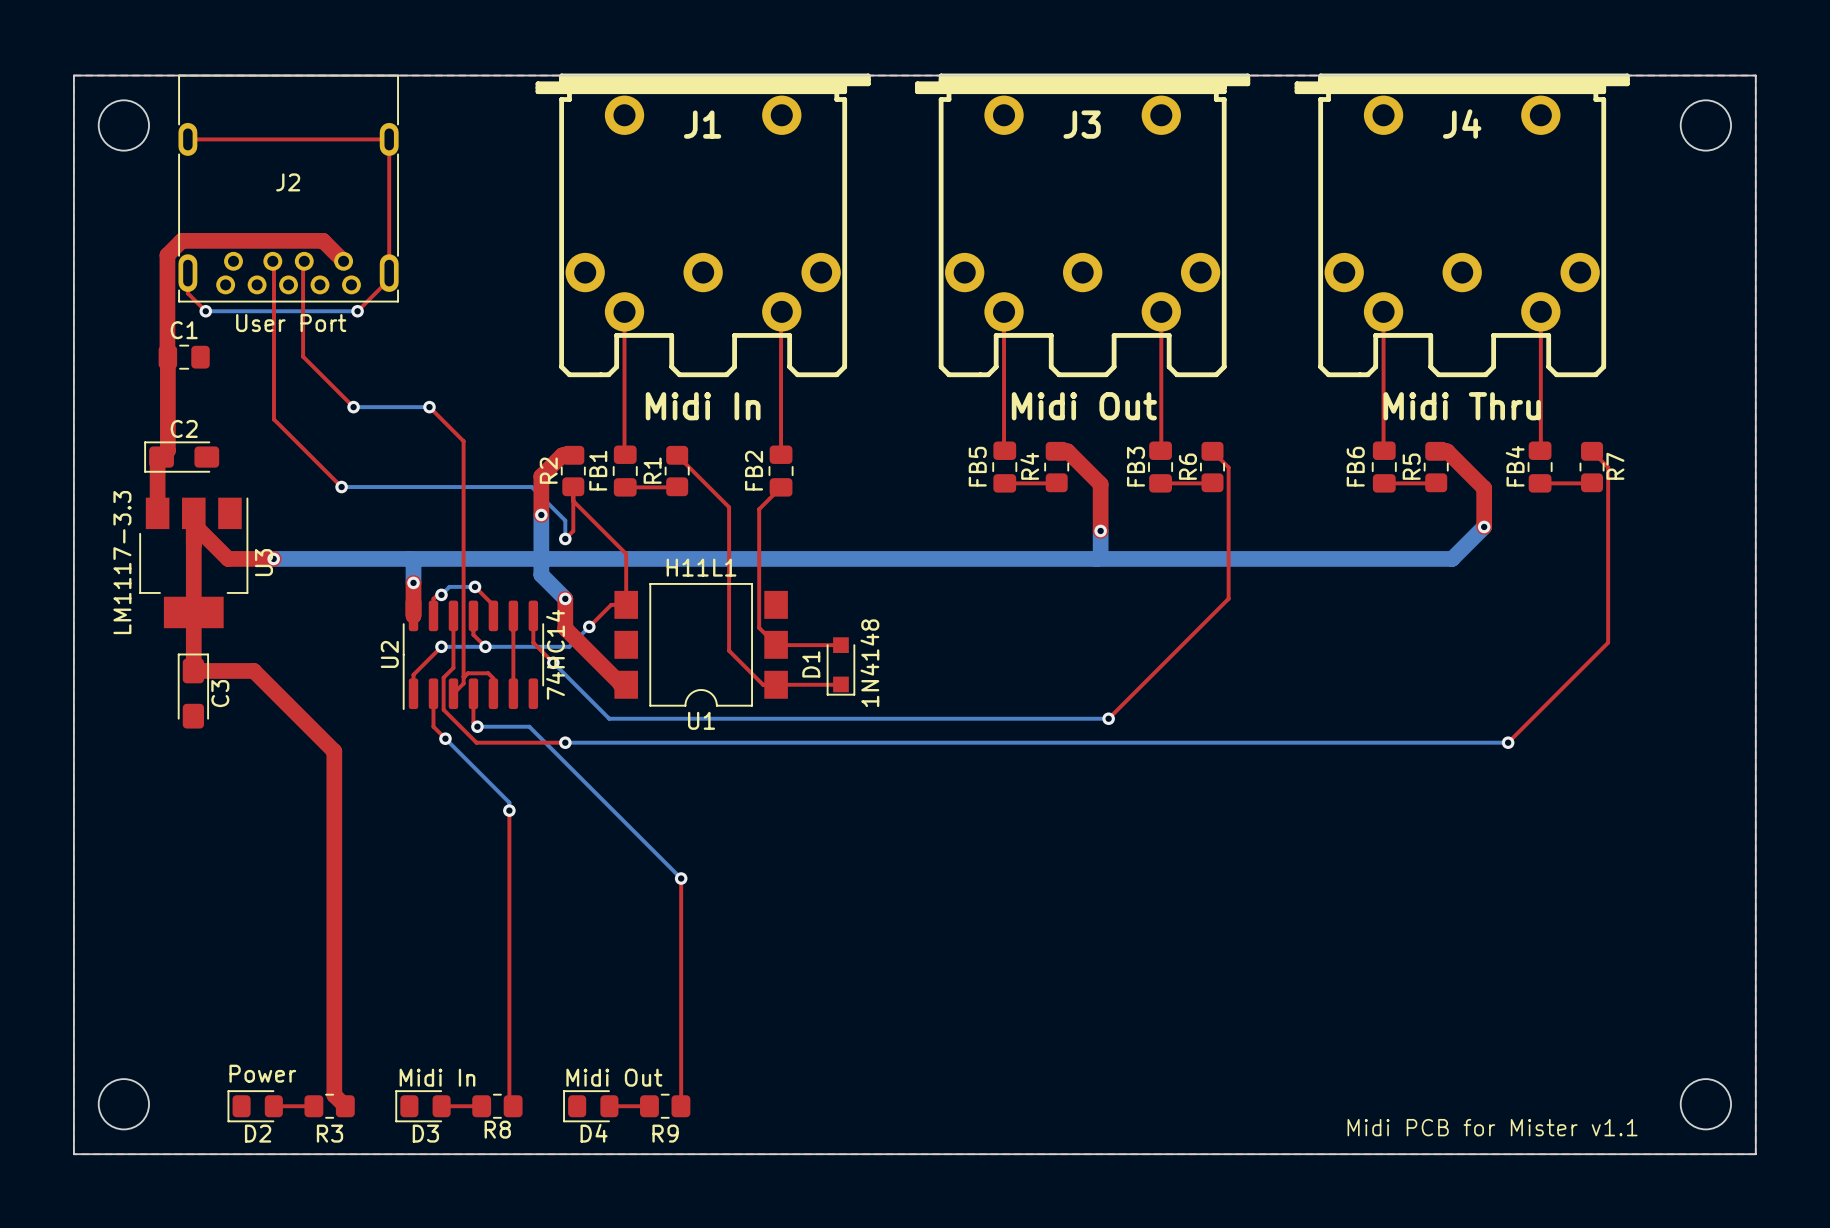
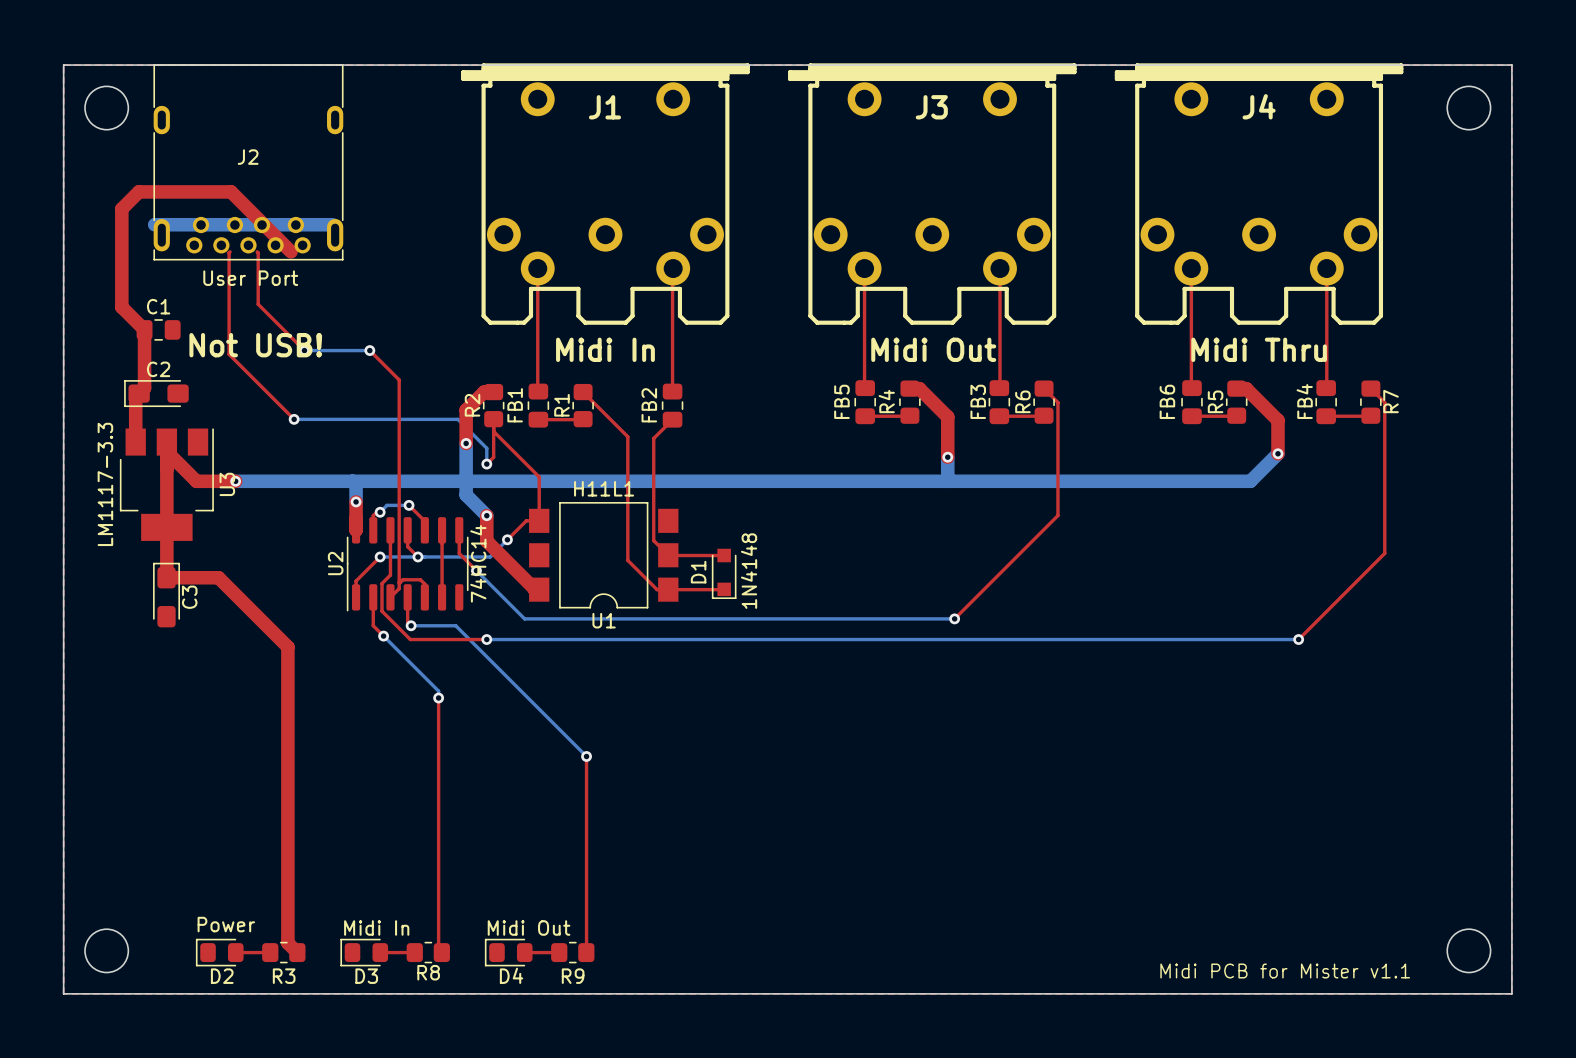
top track: (187, 139) (389, 139) (389, 279) (357, 311) -> none
bottom track: none -> (154, 224) (332, 224)
top track: (272, 261) (274, 419) -> (230, 251) (229, 354) (235, 361)
top track: (304, 261) (303, 356) -> (257, 251) (258, 304) (260, 307)
top track: (343, 261) (323, 240) (181, 240) (167, 255) (167, 383) -> (291, 251) (231, 191) (138, 191) (121, 208) (121, 307) (144, 329)
top track: (187, 273) (187, 293) (205, 311) -> none
bottom track: (205, 311) (357, 311) -> none
via: (205, 311) -> none
via: (357, 311) -> none
C1 position: (184, 357) -> (158, 329)
text: none -> Not USB! (255, 345)

